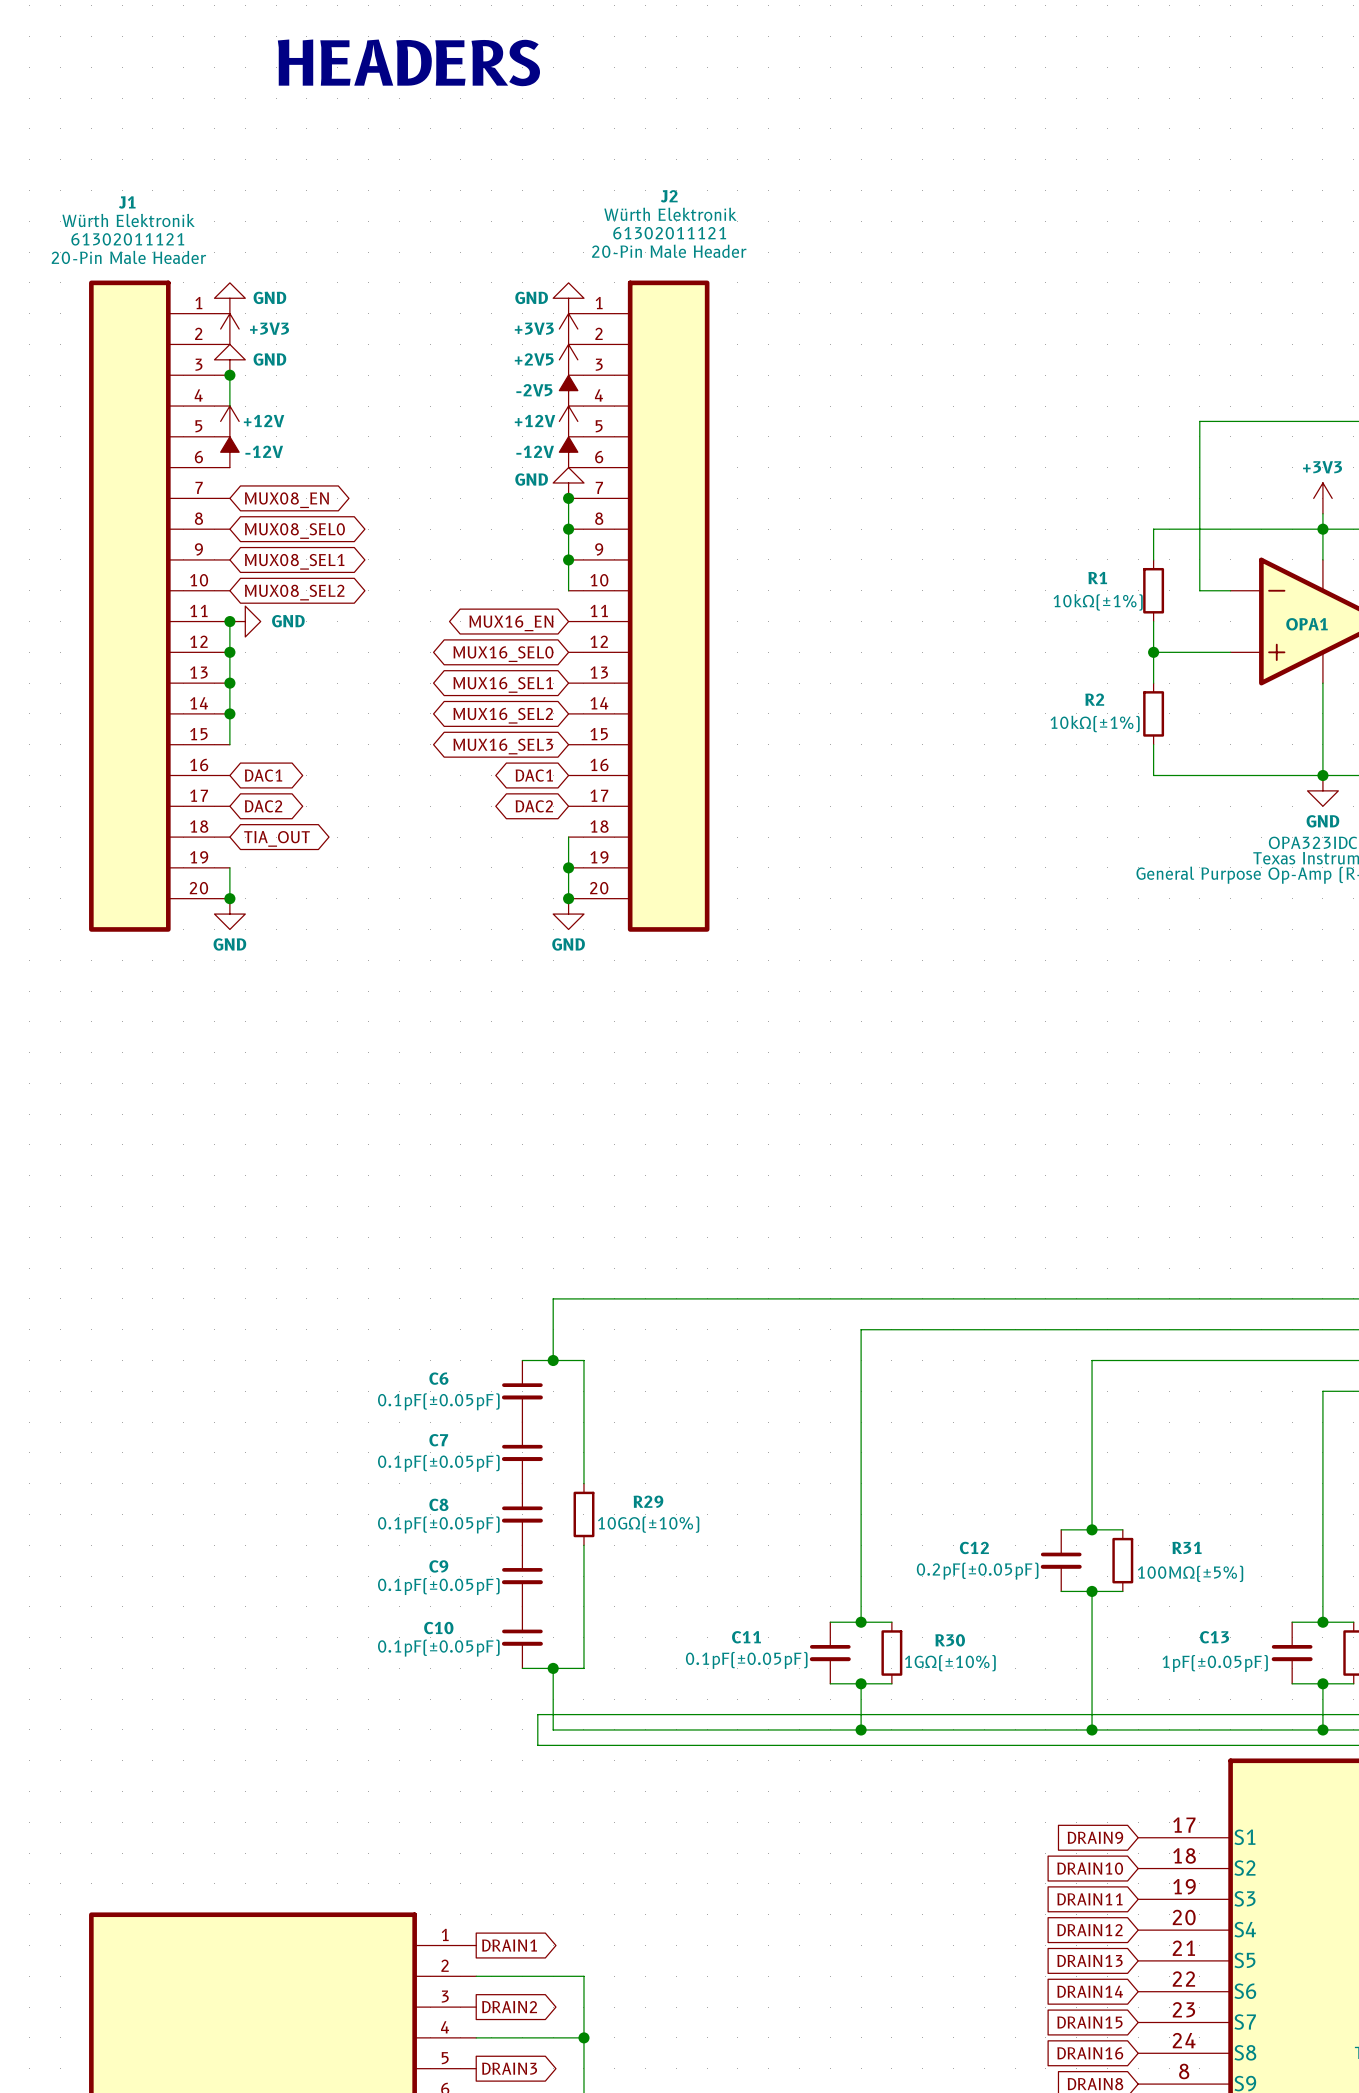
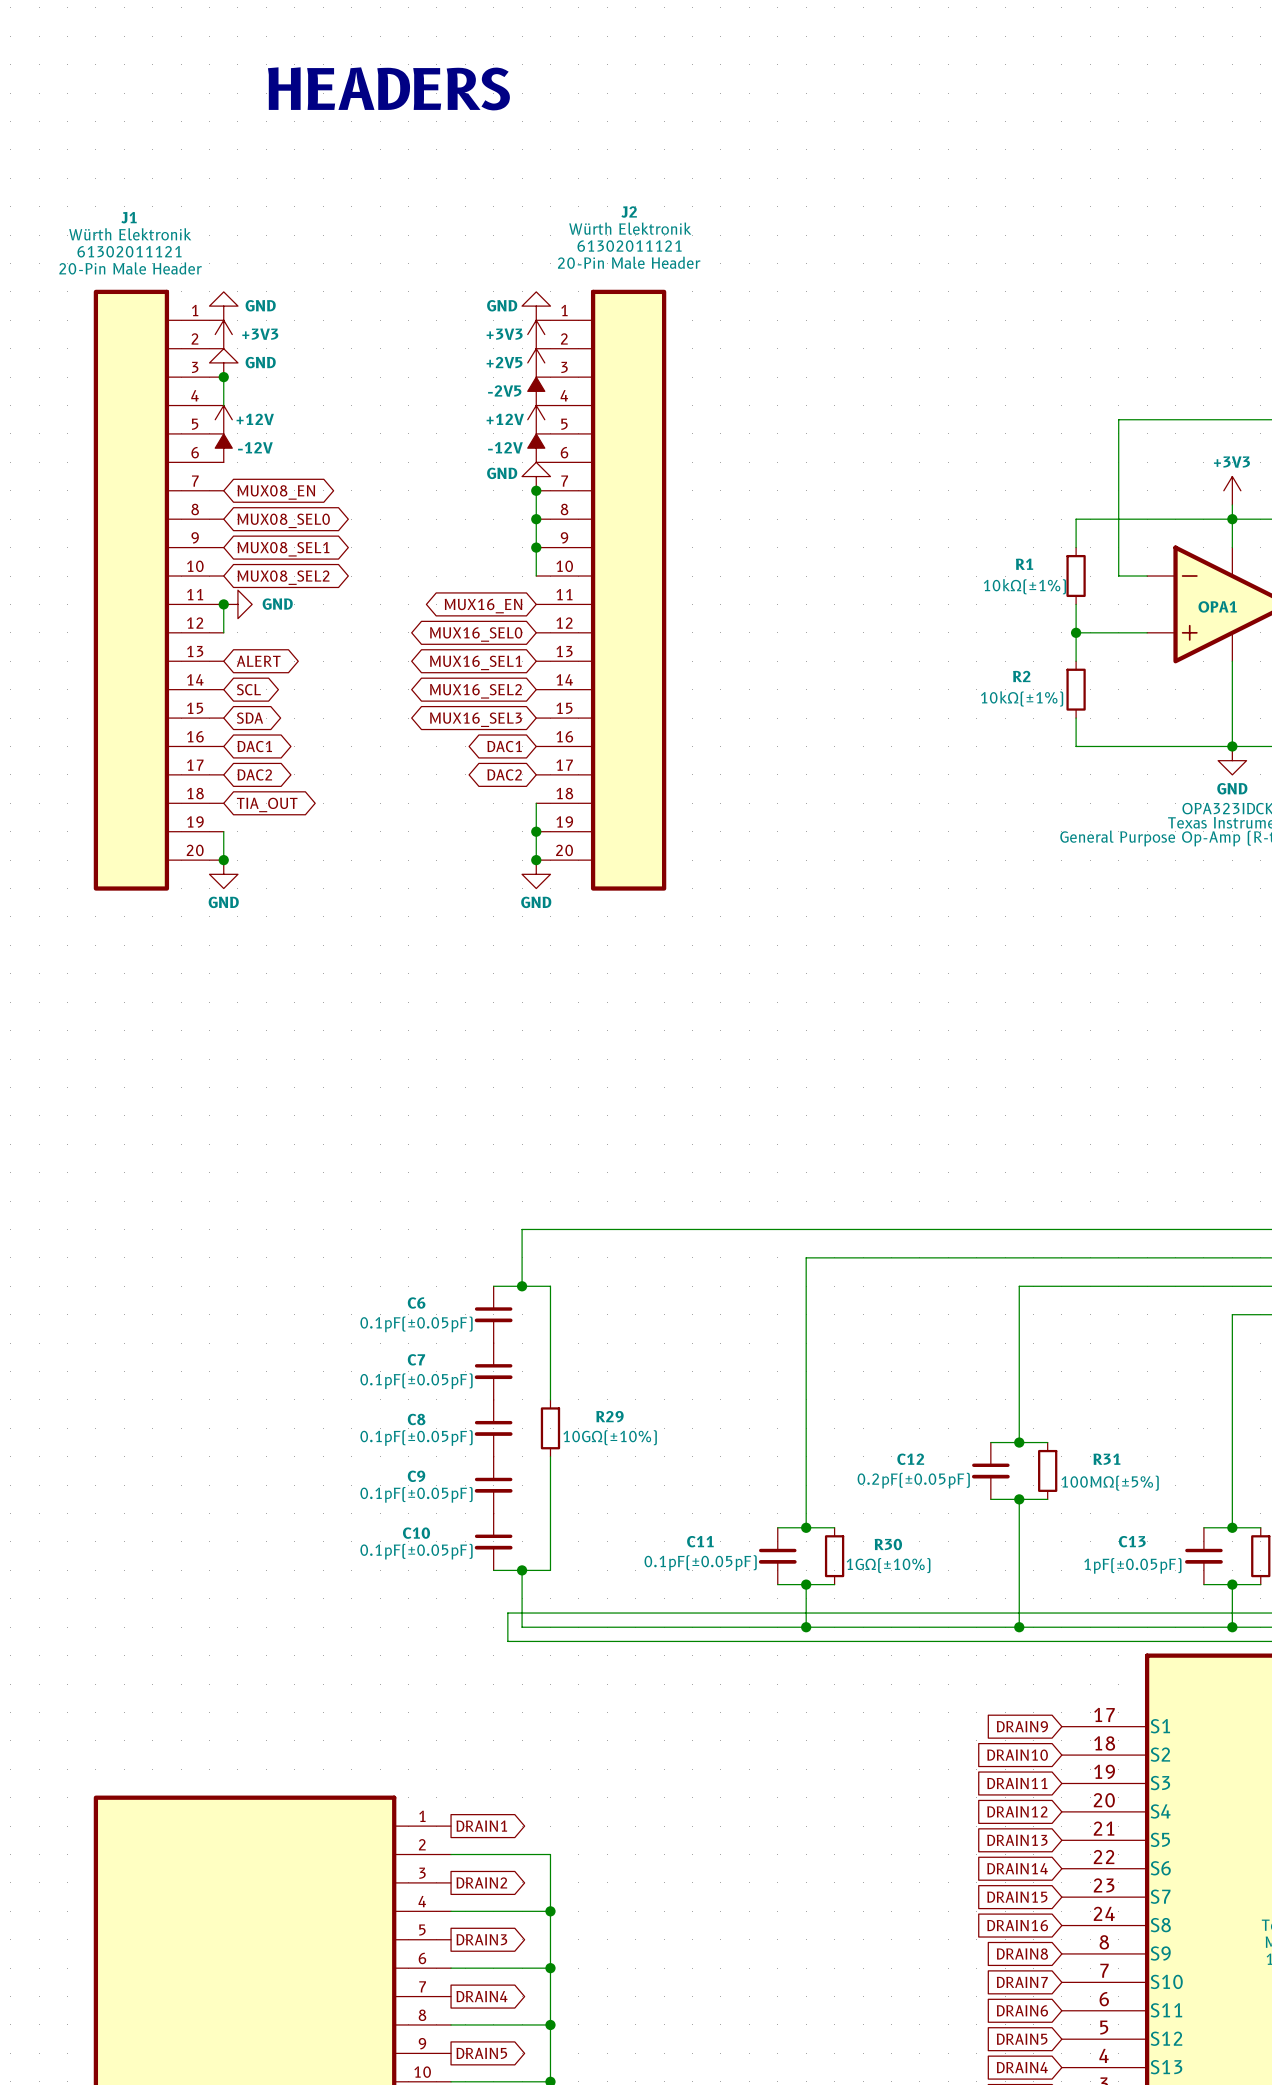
wire: (229, 652) (229, 744) -> none
junction: (229, 652) -> none
junction: (229, 683) -> none
global label: none -> ALERT (258, 661)
junction: (229, 713) -> none
global label: none -> SCL (248, 689)
global label: none -> SDA (250, 718)

